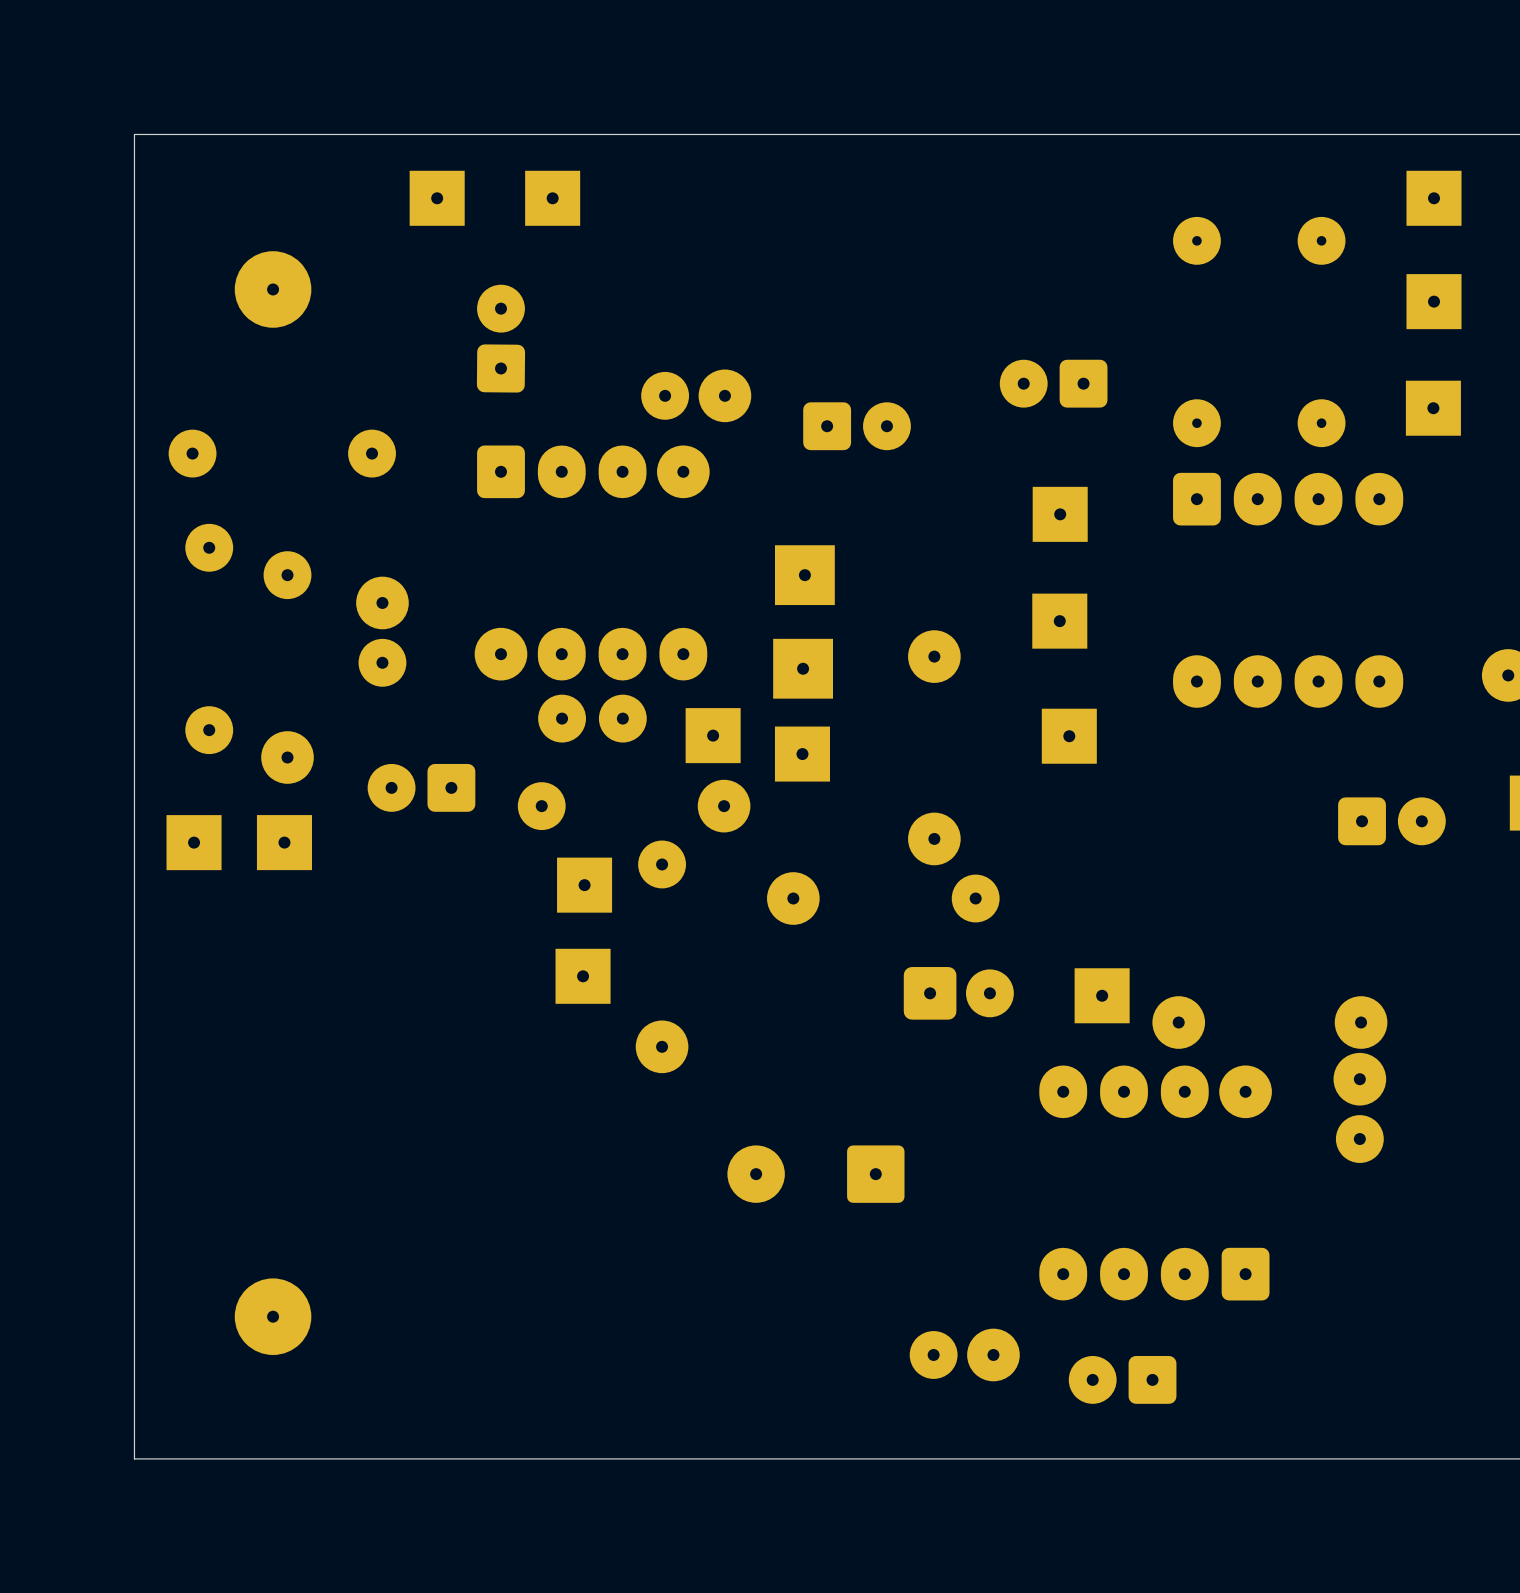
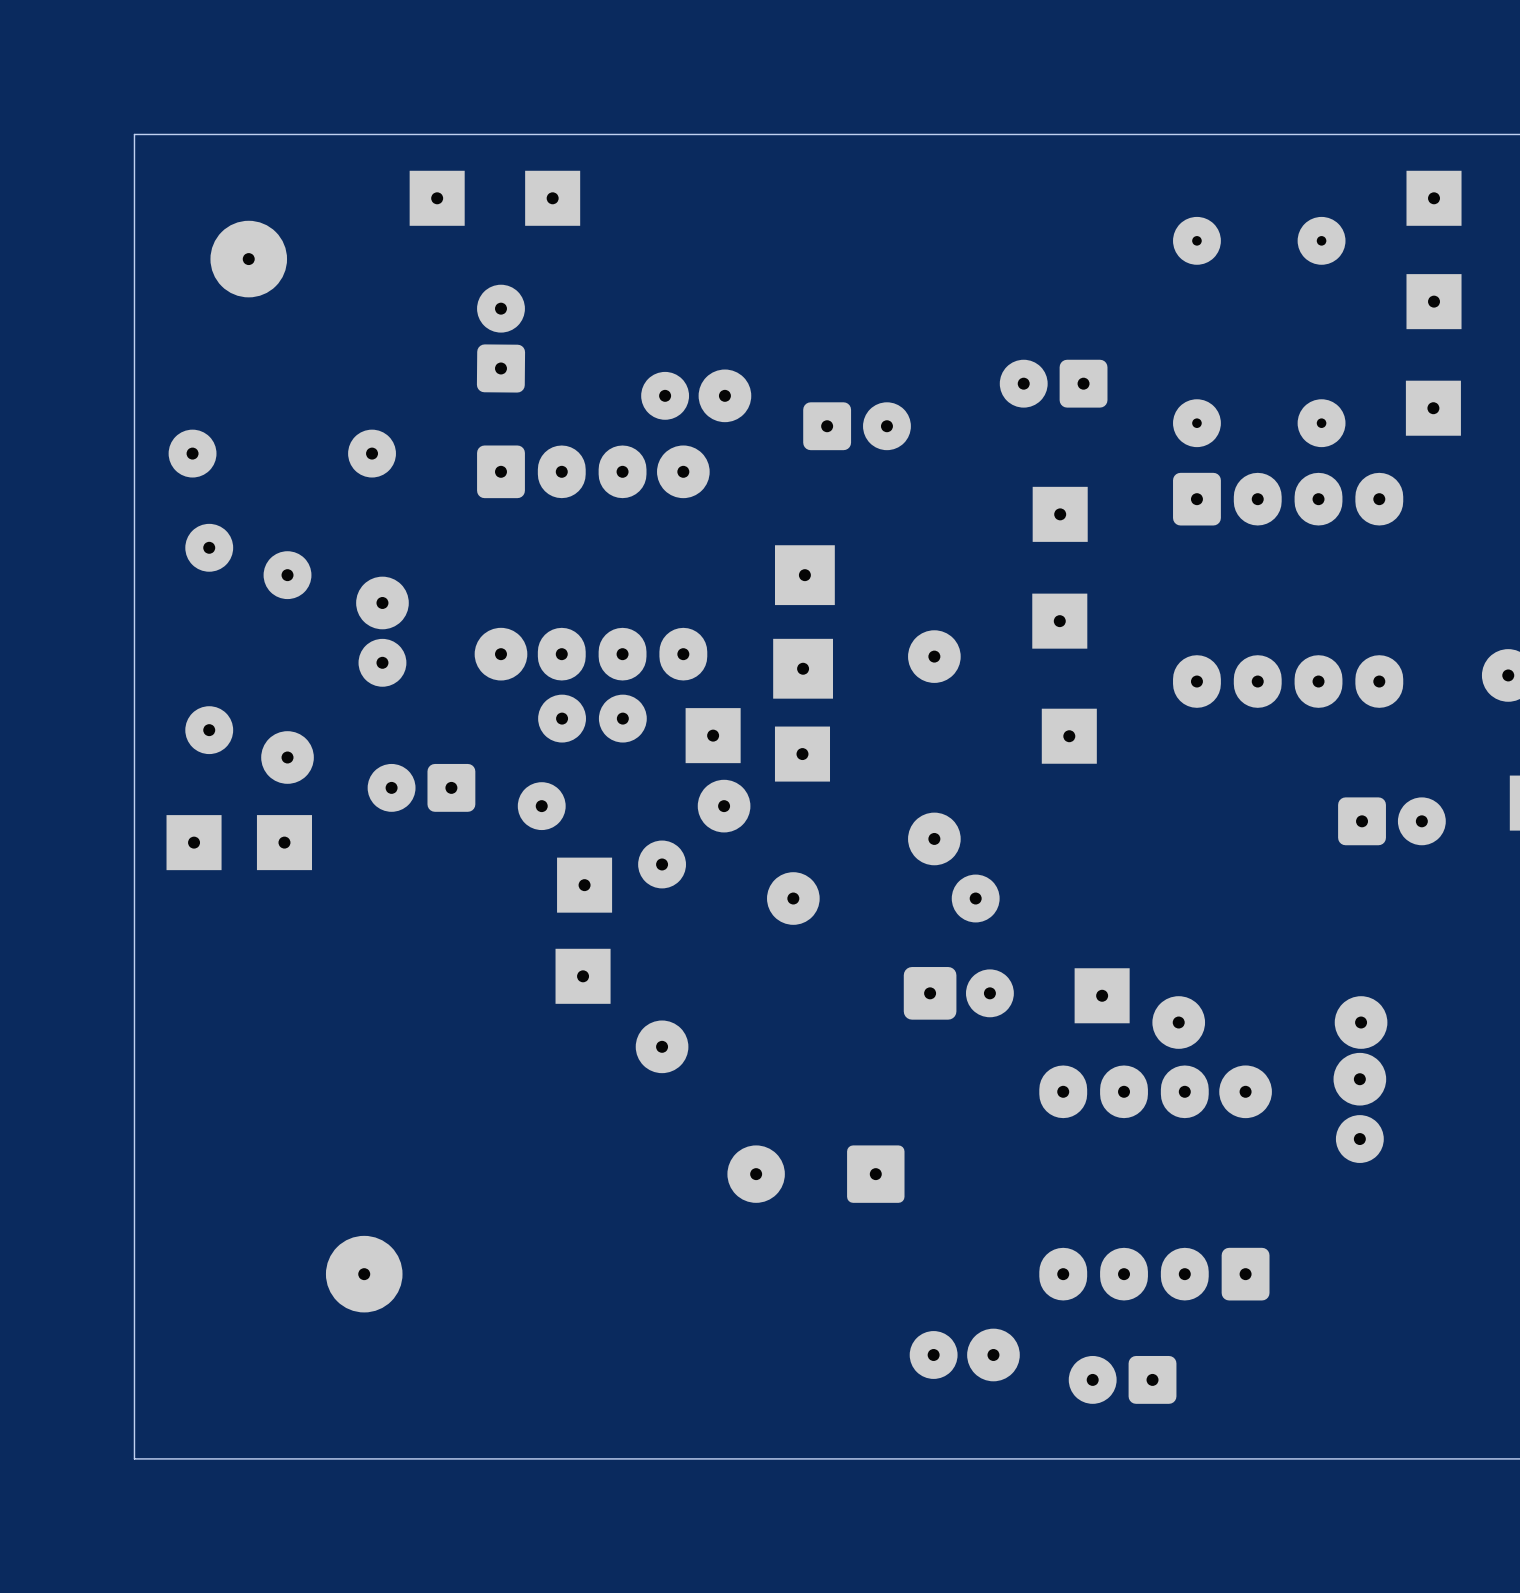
part position: (273, 289) -> (248, 259)
part position: (273, 1316) -> (364, 1274)

